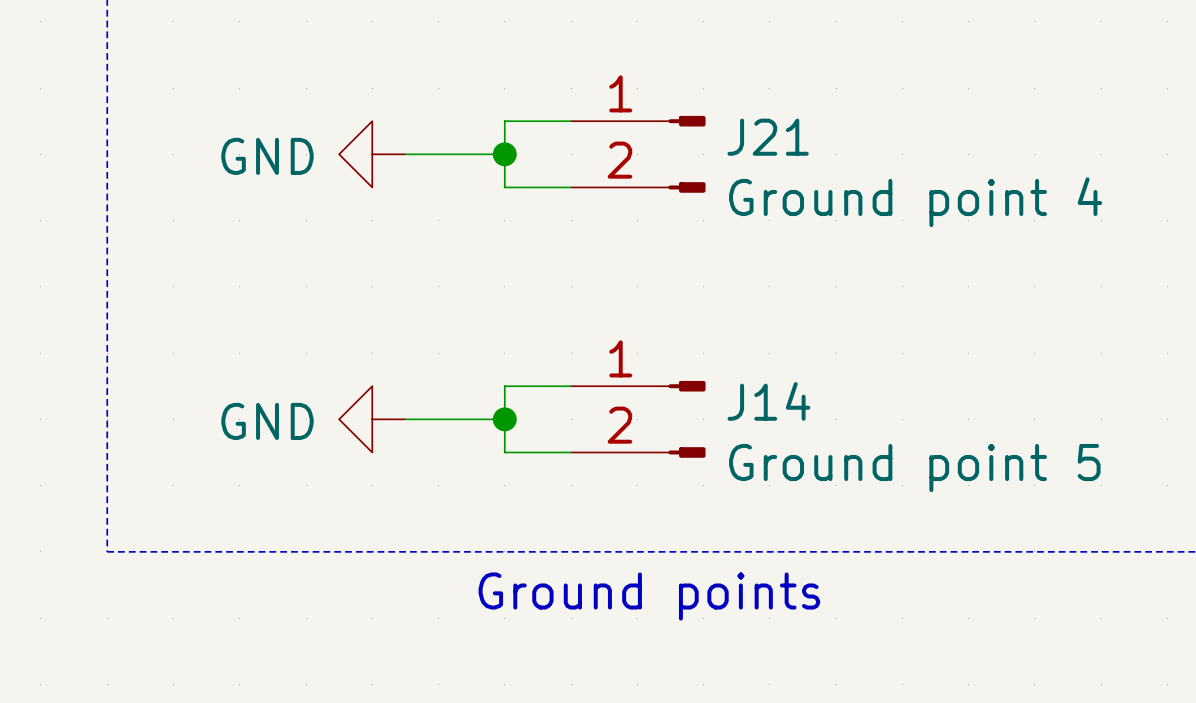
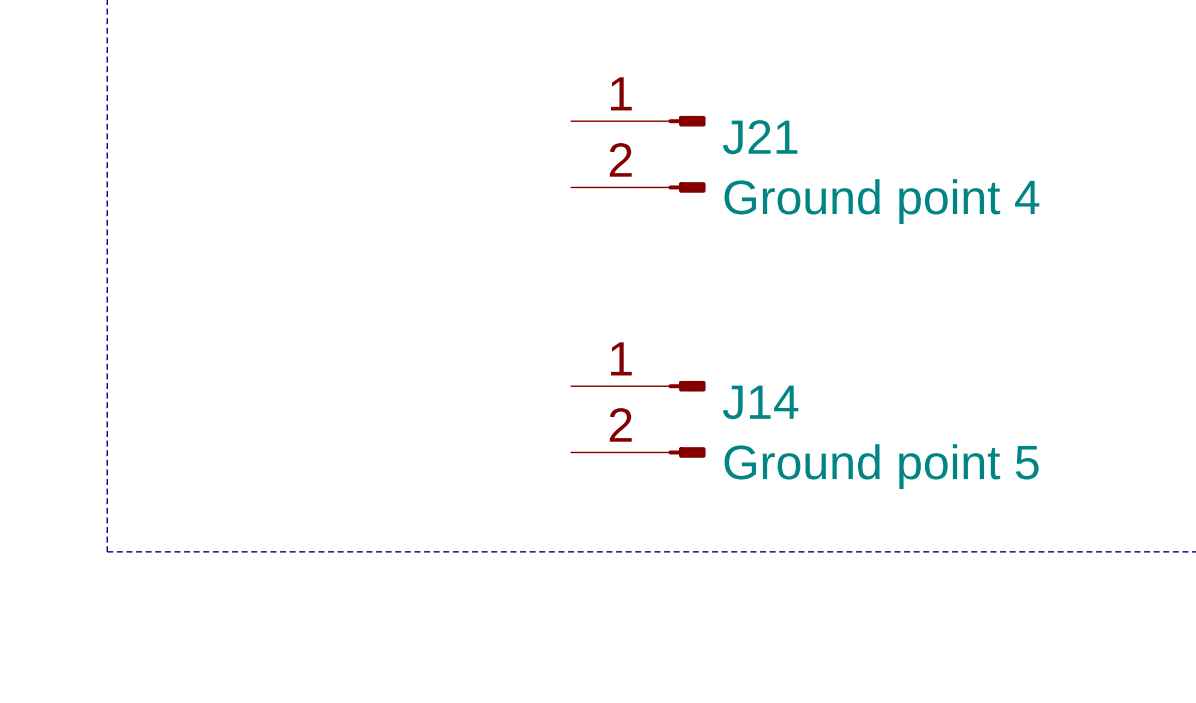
wire: (571, 121) (504, 121) (504, 187) (571, 187) -> none
power symbol: GND (372, 154) -> none
wire: (405, 154) (504, 154) -> none
junction: (504, 154) -> none
wire: (571, 386) (504, 386) (504, 452) (571, 452) -> none
power symbol: GND (372, 419) -> none
wire: (405, 419) (504, 419) -> none
junction: (504, 419) -> none
text: Ground points (649, 596) -> none

